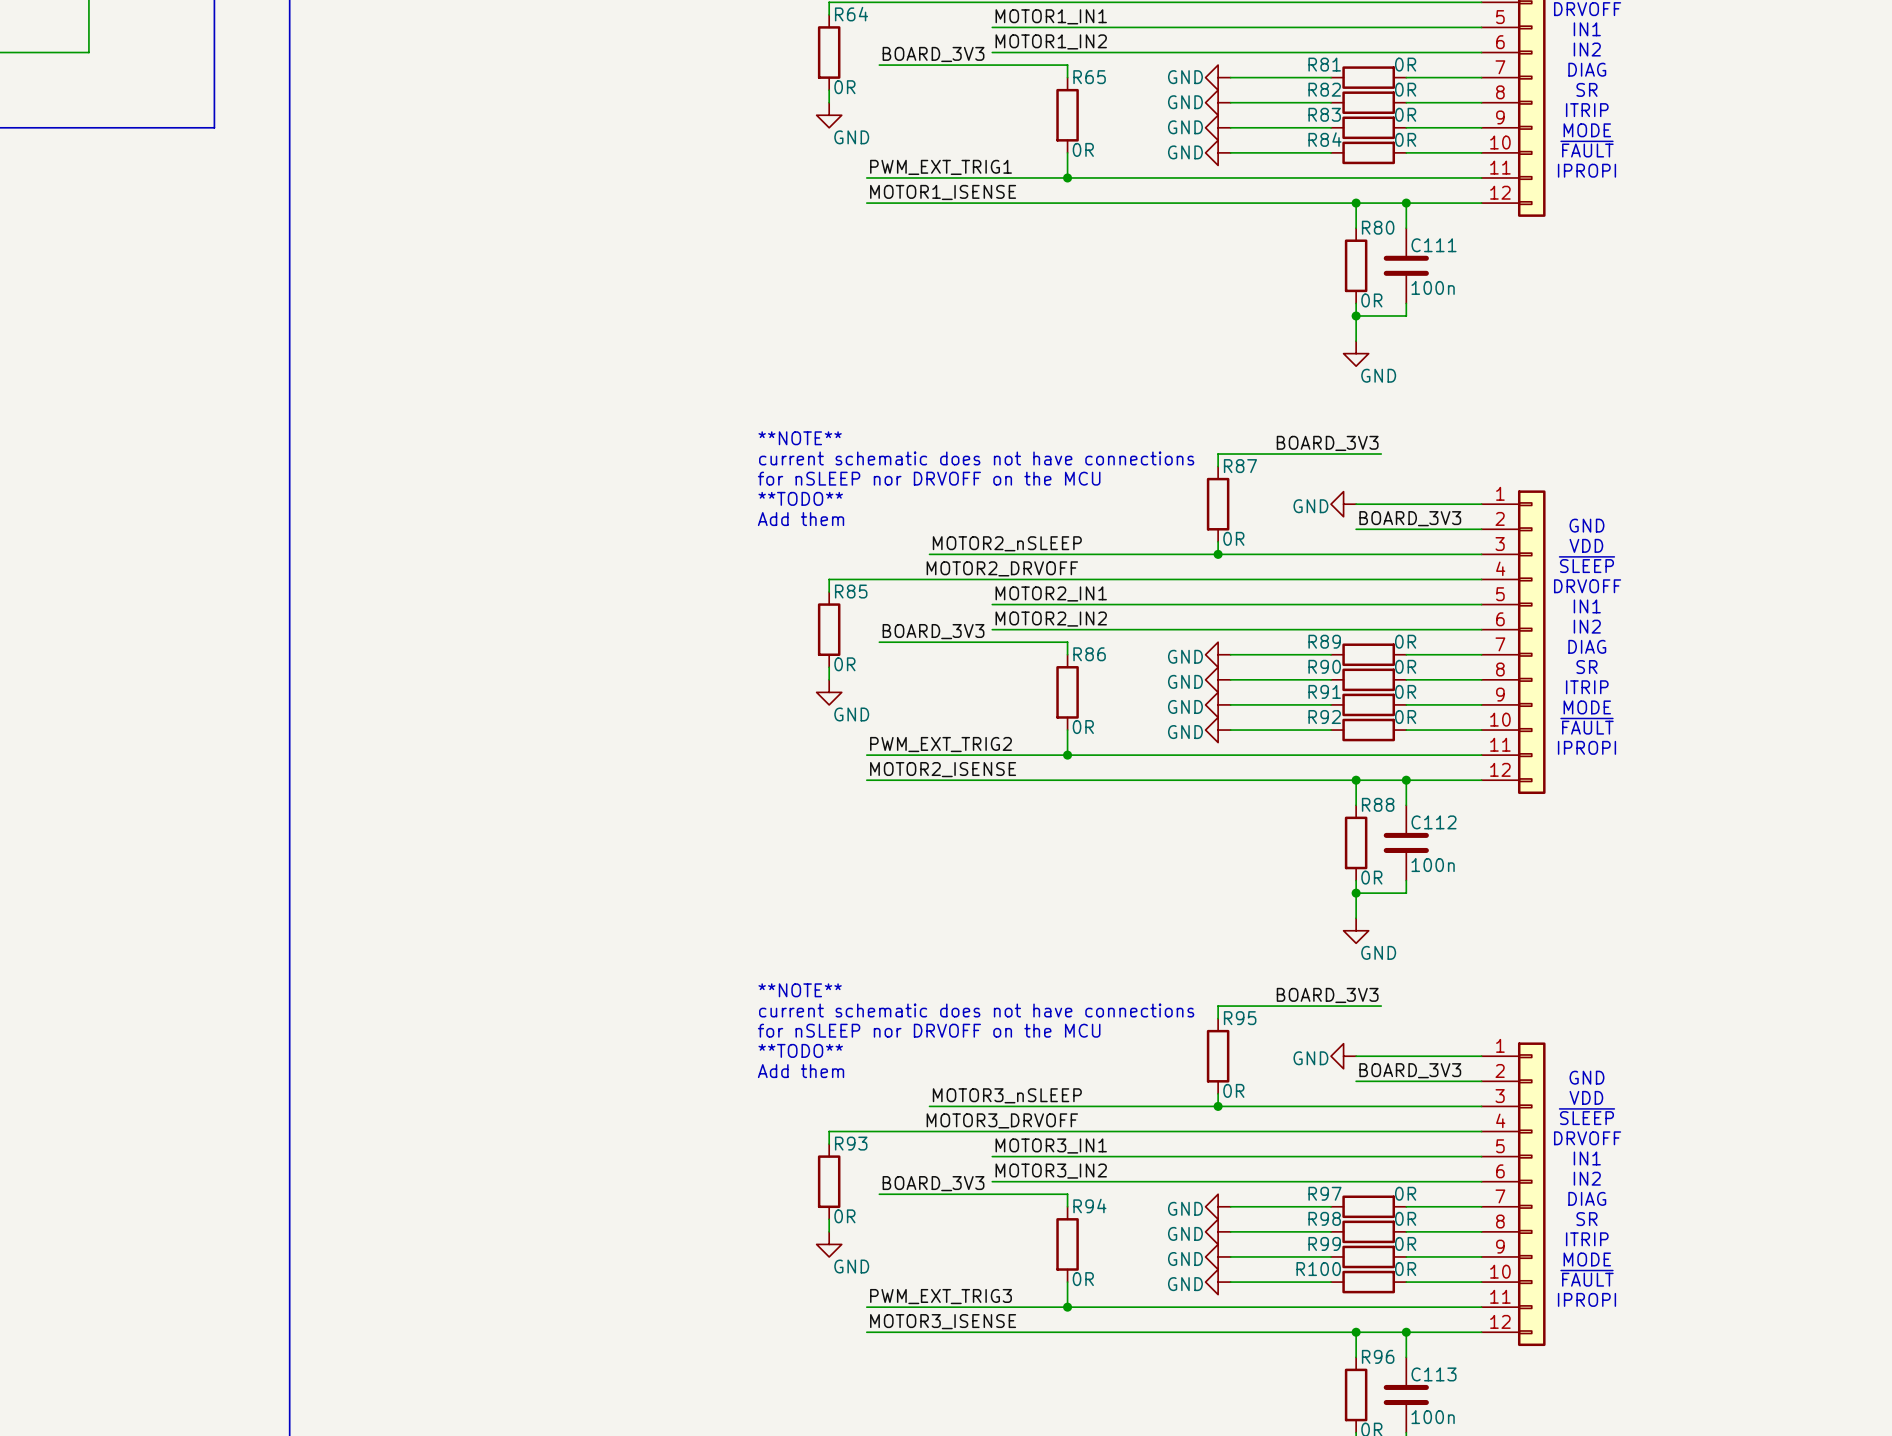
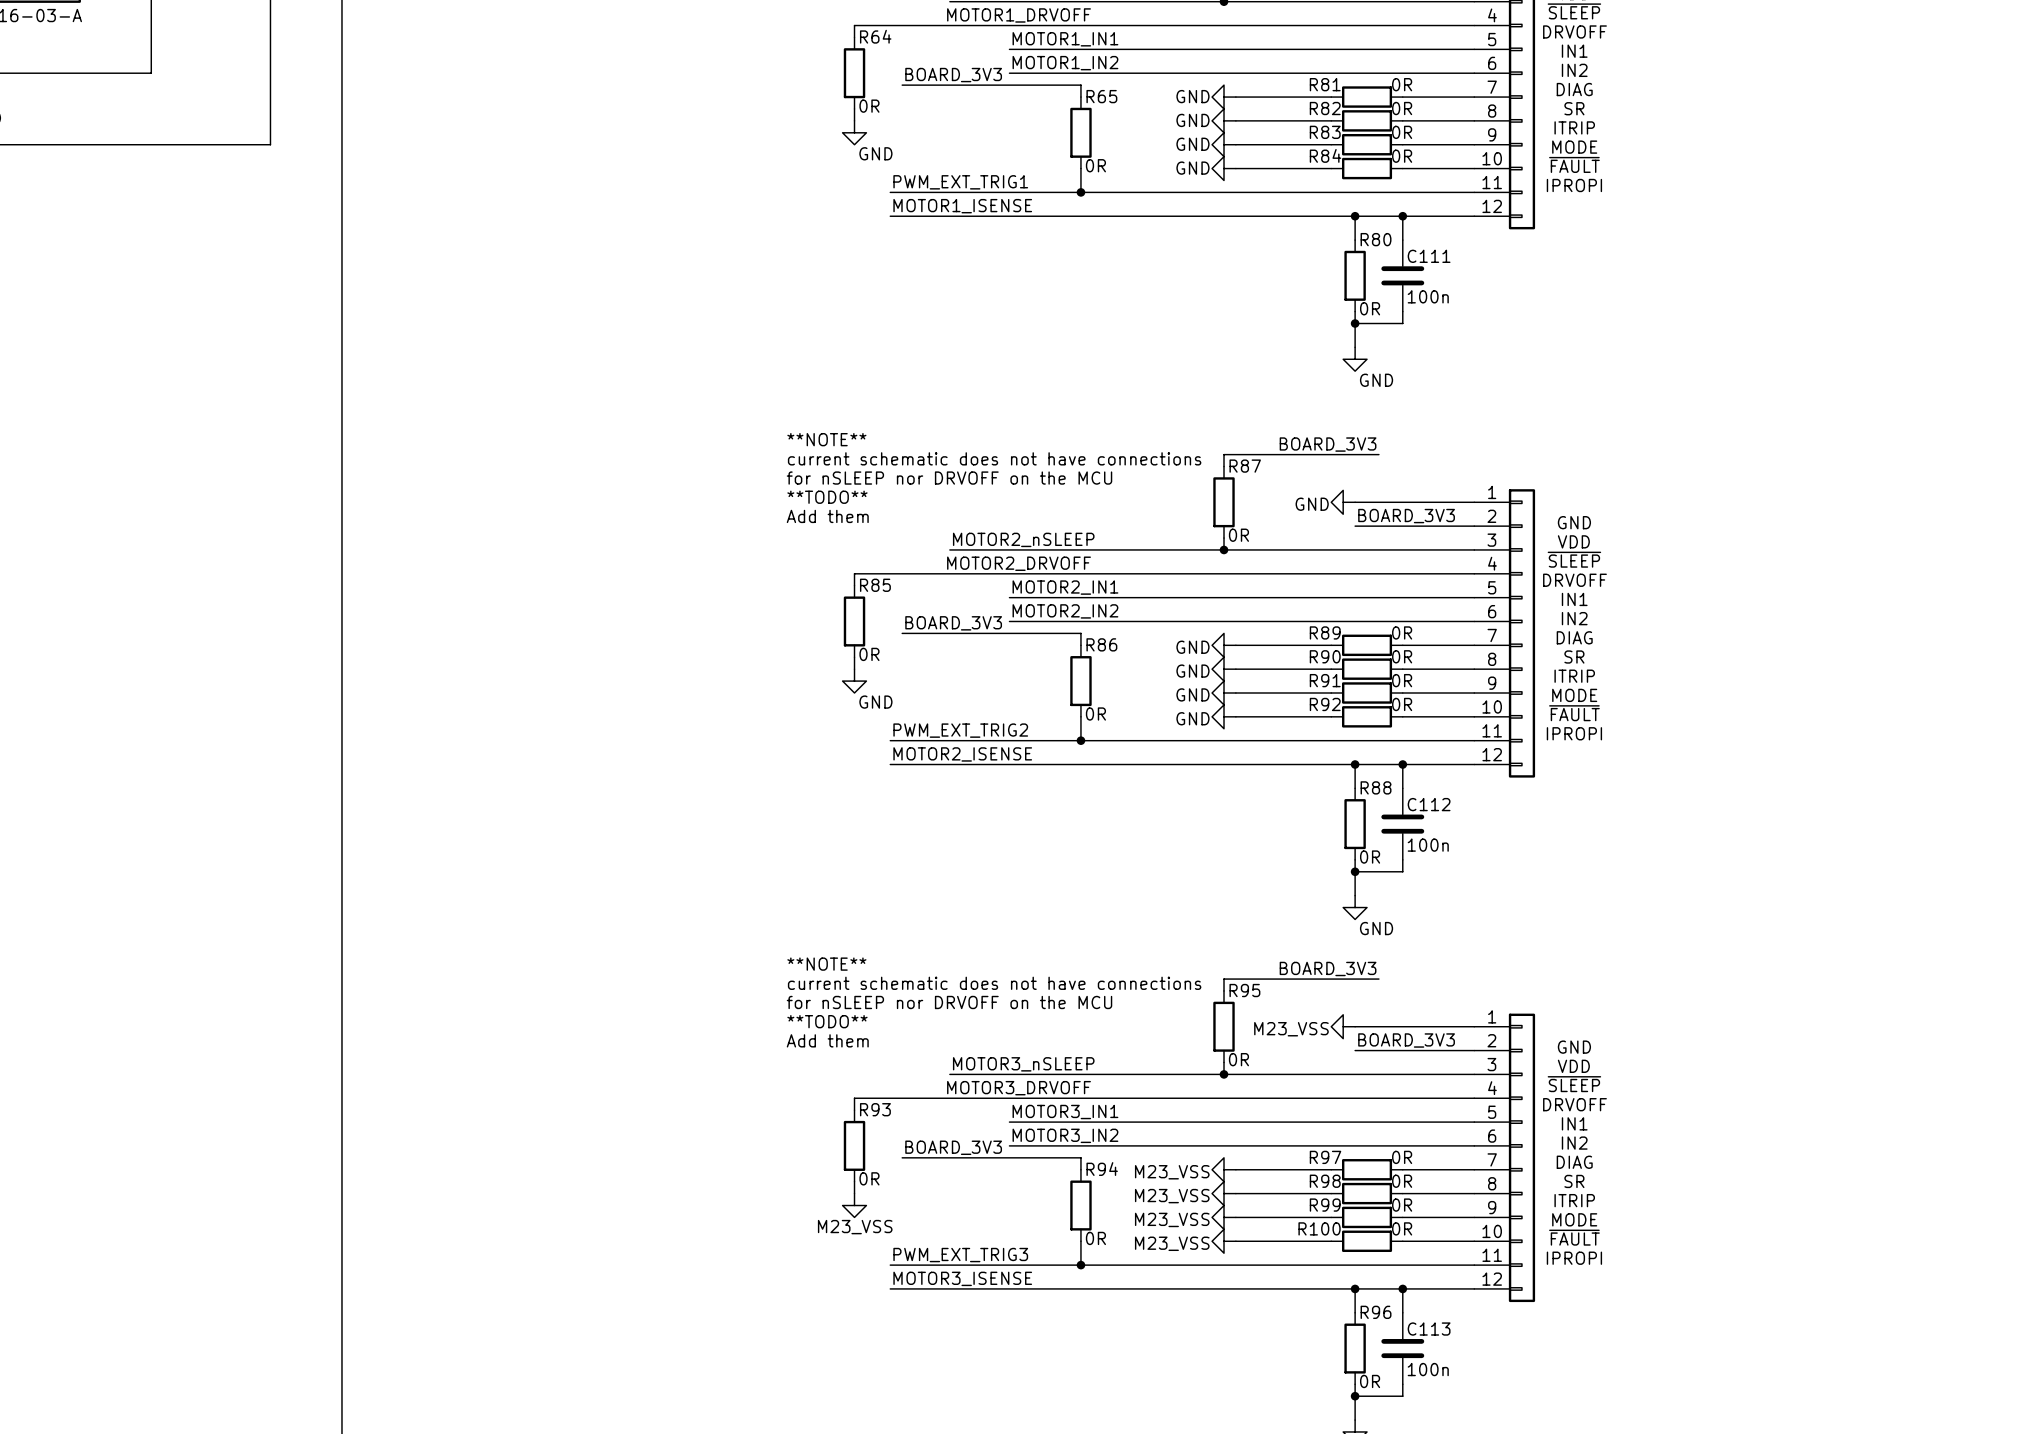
power symbol: GND (1343, 1056) -> M23_VSS (1343, 1026)
power symbol: GND (1218, 1206) -> M23_VSS (1224, 1169)
power symbol: GND (1218, 1231) -> M23_VSS (1224, 1193)
power symbol: GND (829, 1244) -> M23_VSS (854, 1205)
power symbol: GND (1218, 1256) -> M23_VSS (1224, 1217)
power symbol: GND (1218, 1282) -> M23_VSS (1224, 1241)

